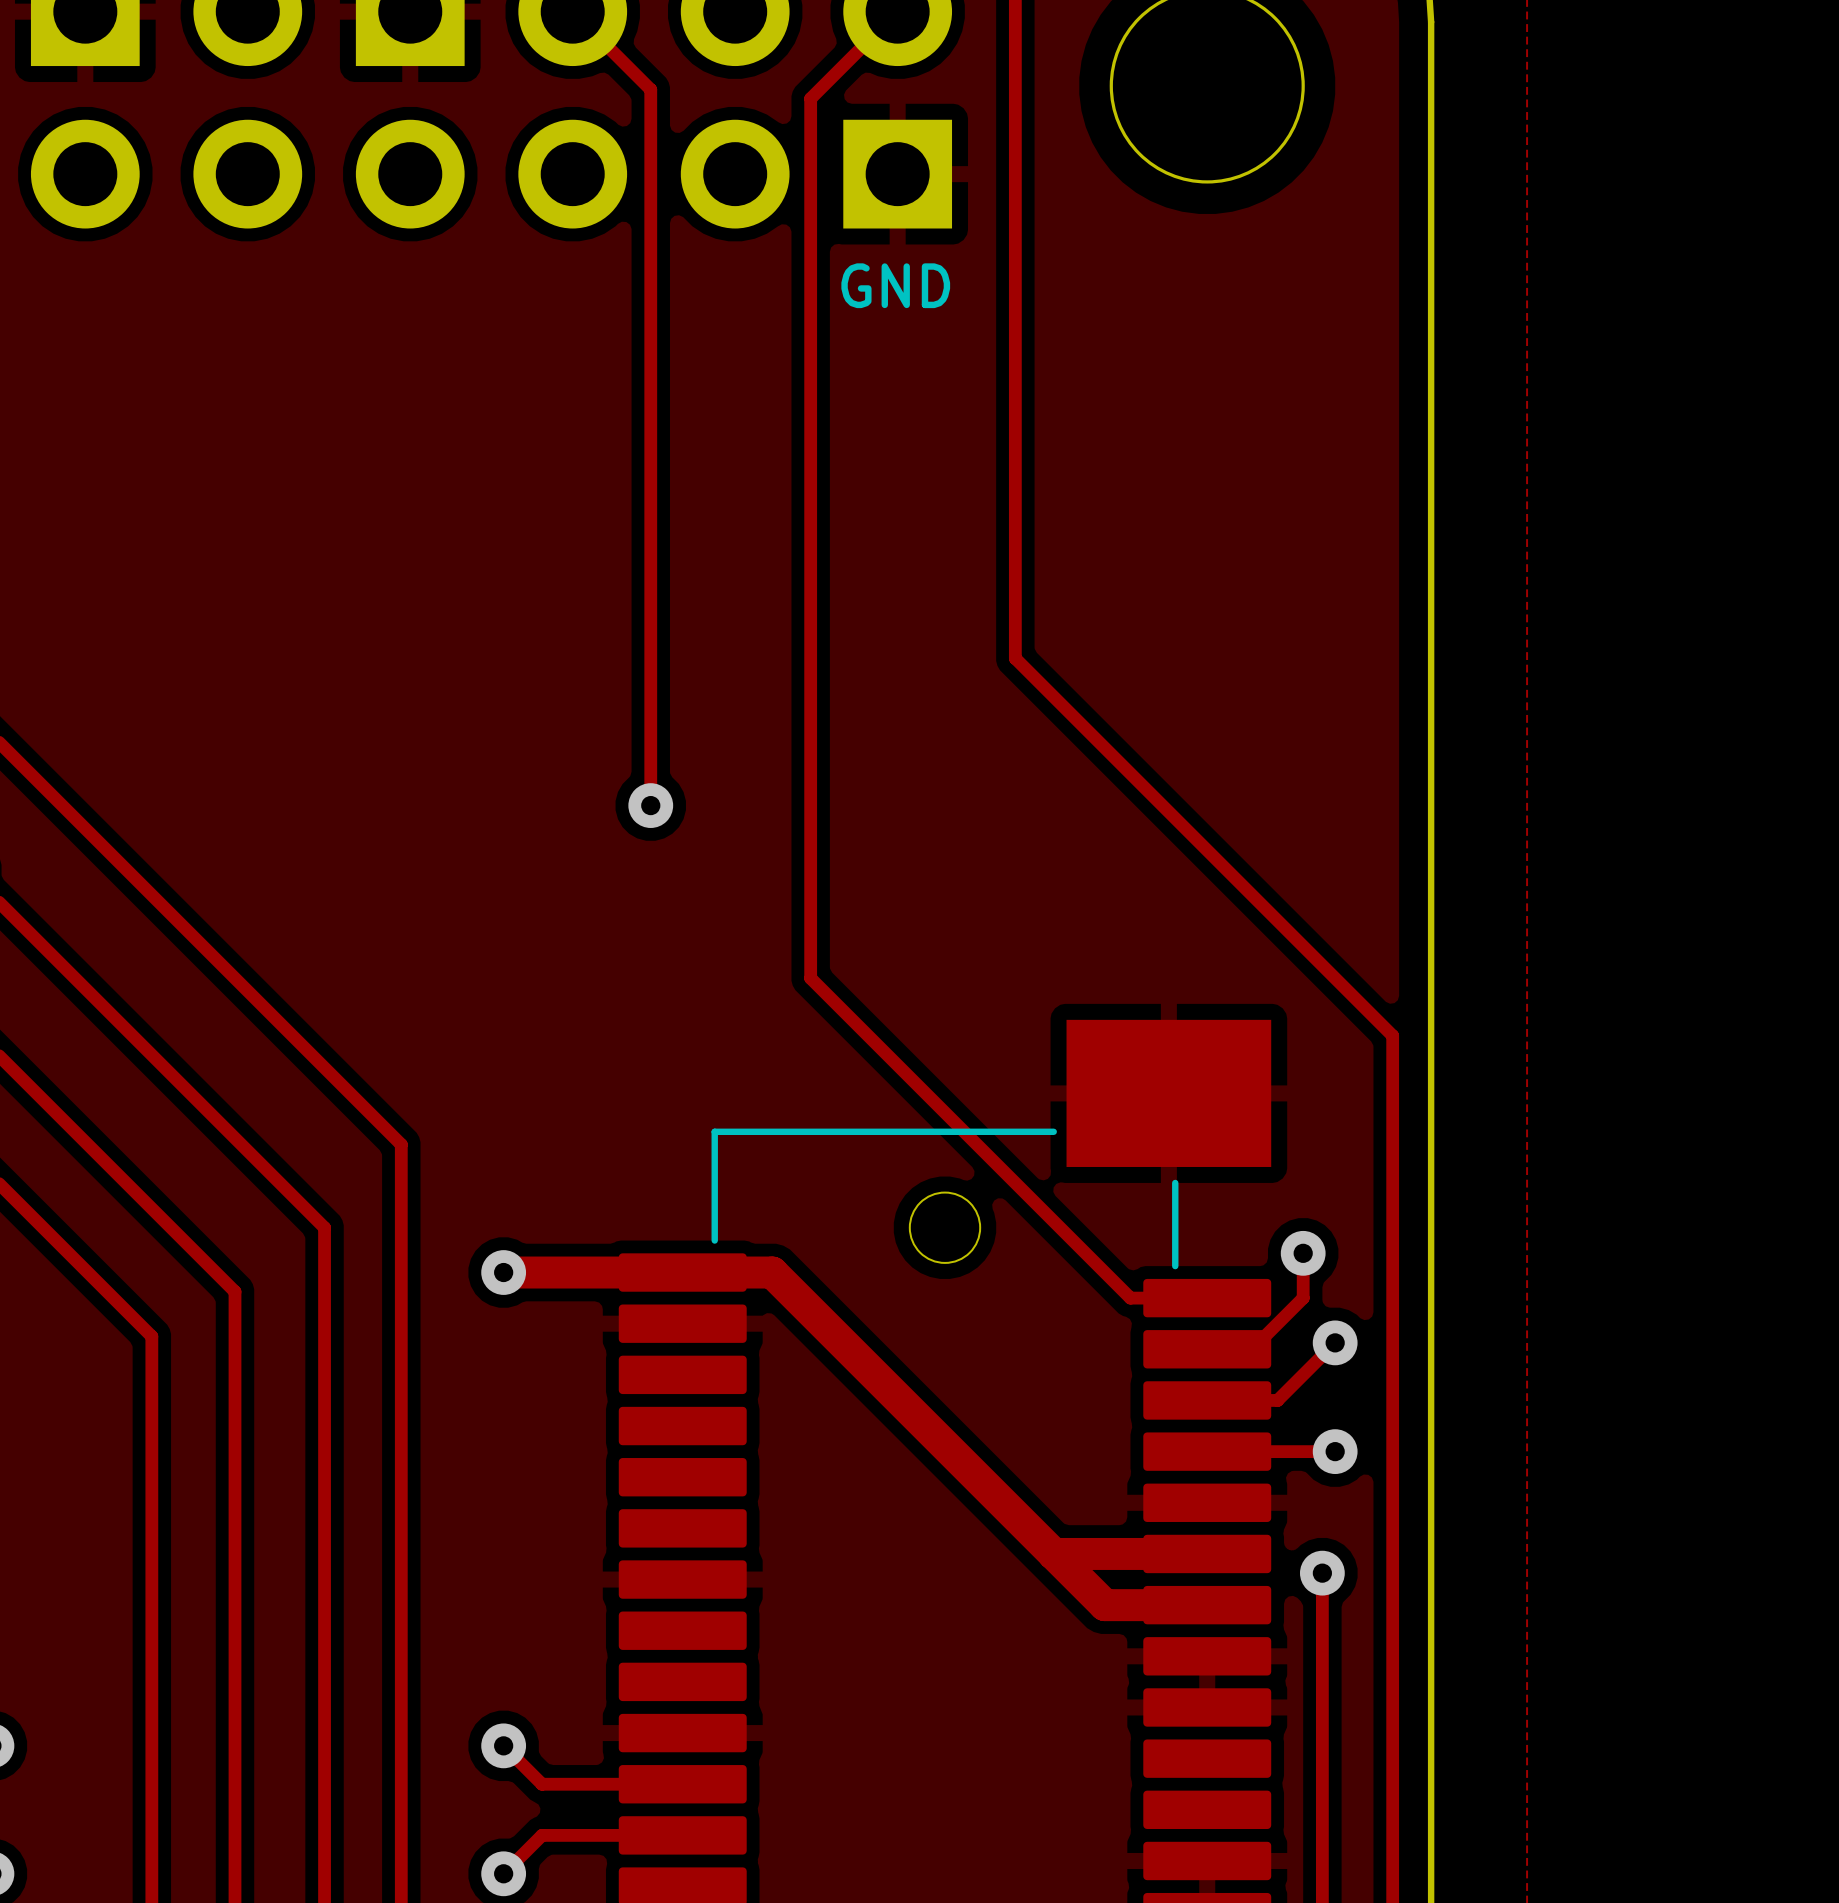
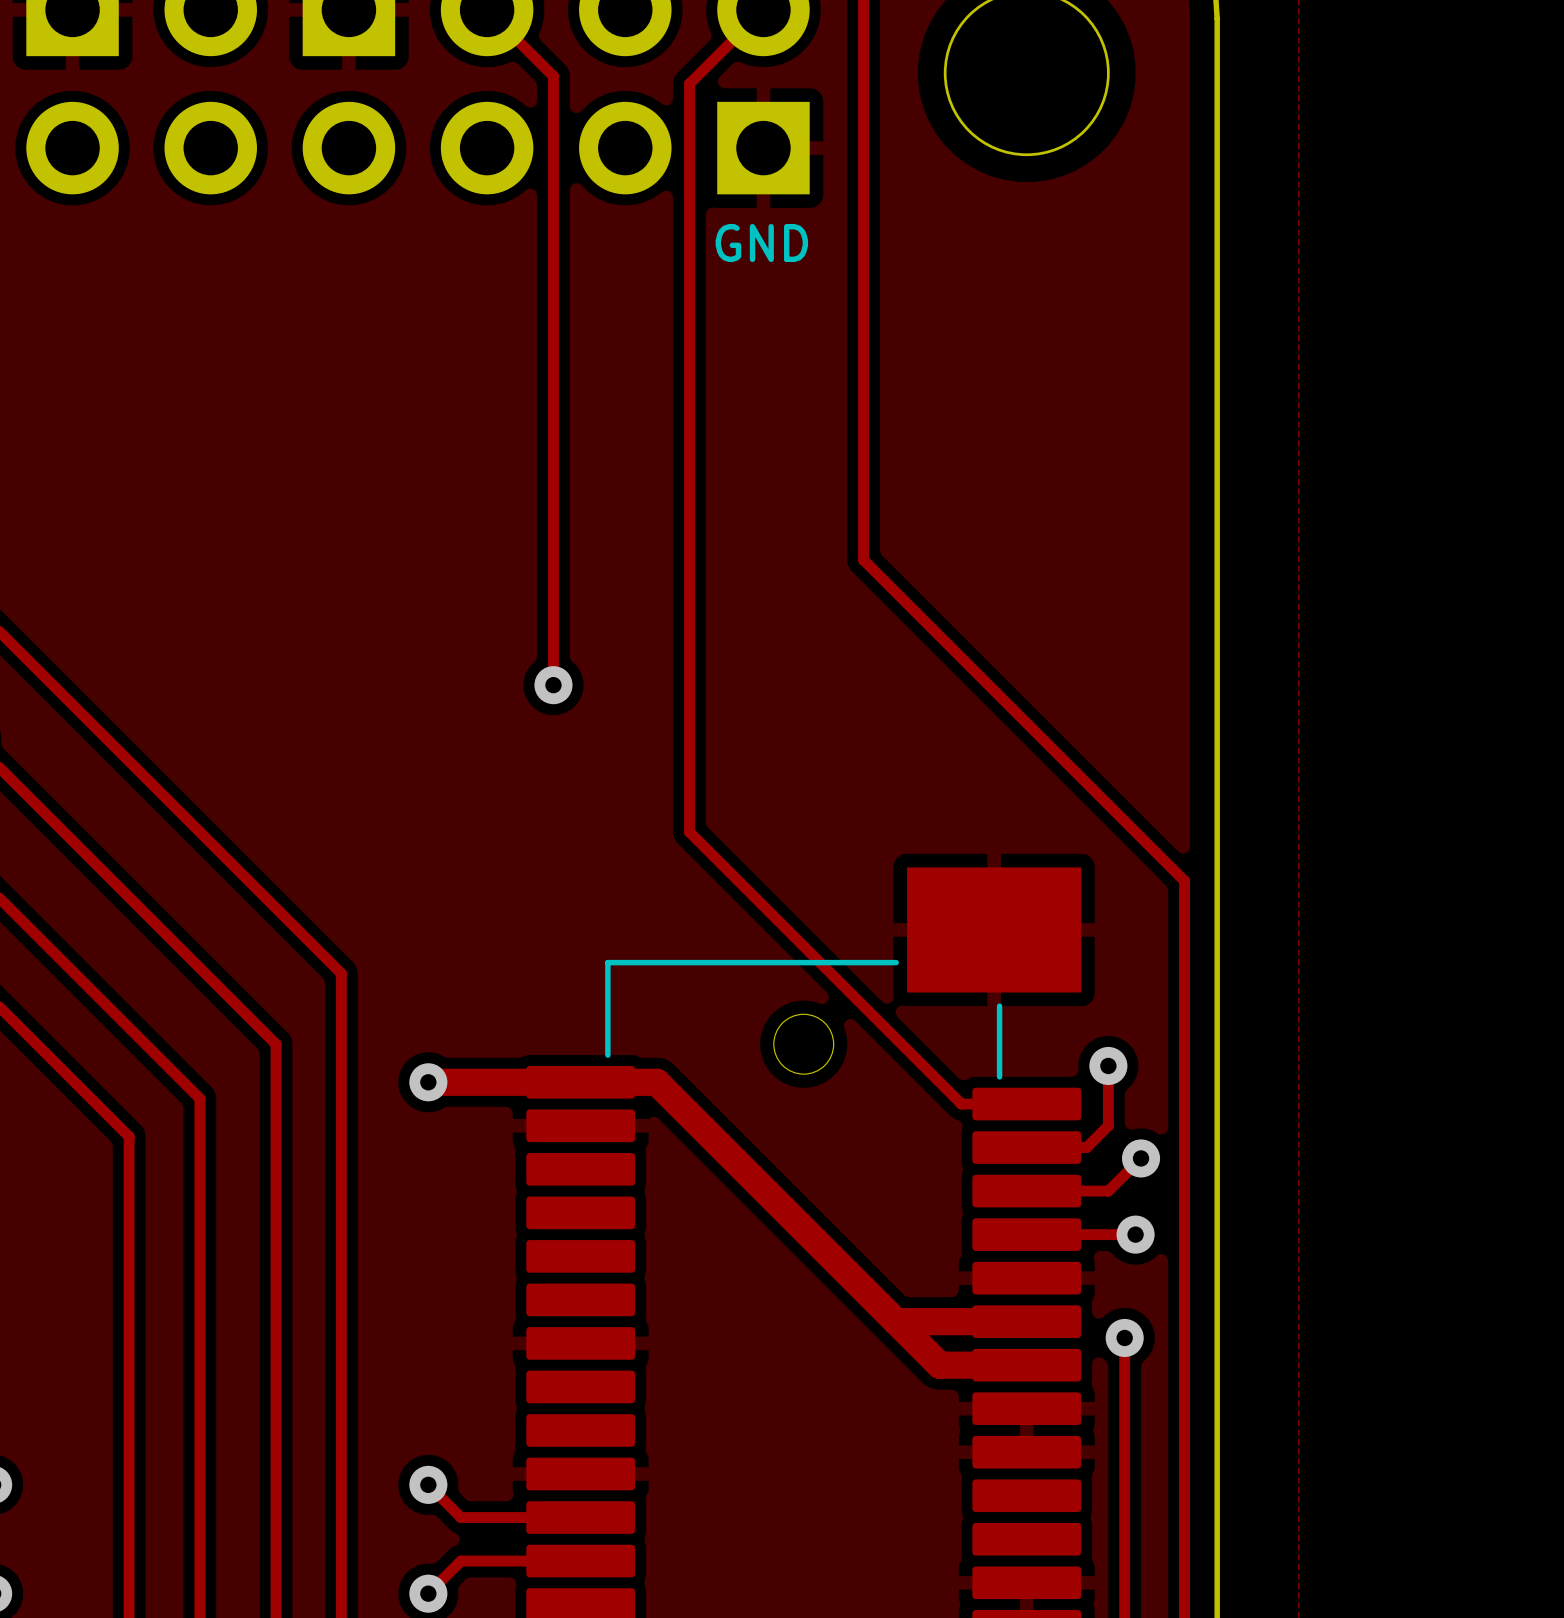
track: (1303, 1298) (1252, 1349) -> (1108, 1104) (1108, 1125) (1086, 1147) (1064, 1147)
track: (1335, 1342) (1277, 1400) -> (1141, 1158) (1108, 1191) (1086, 1191)
via position: (1335, 1342) -> (1141, 1158)

